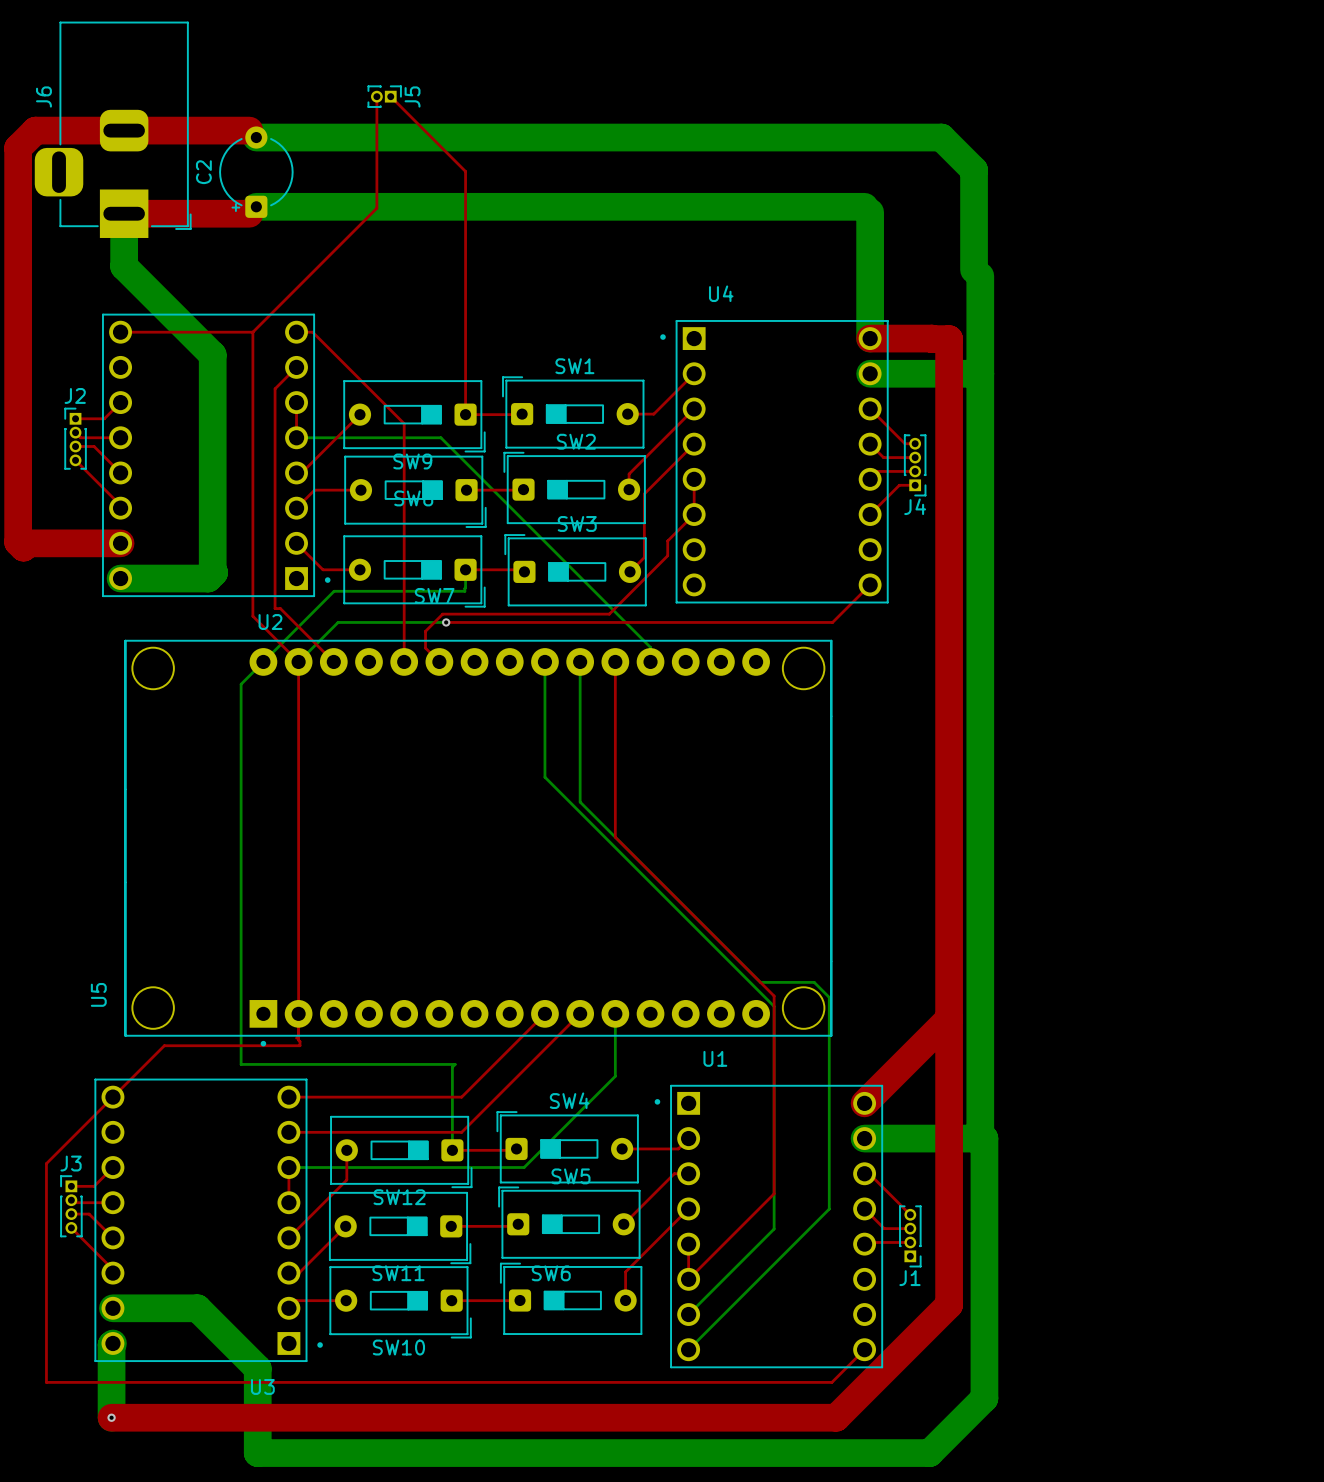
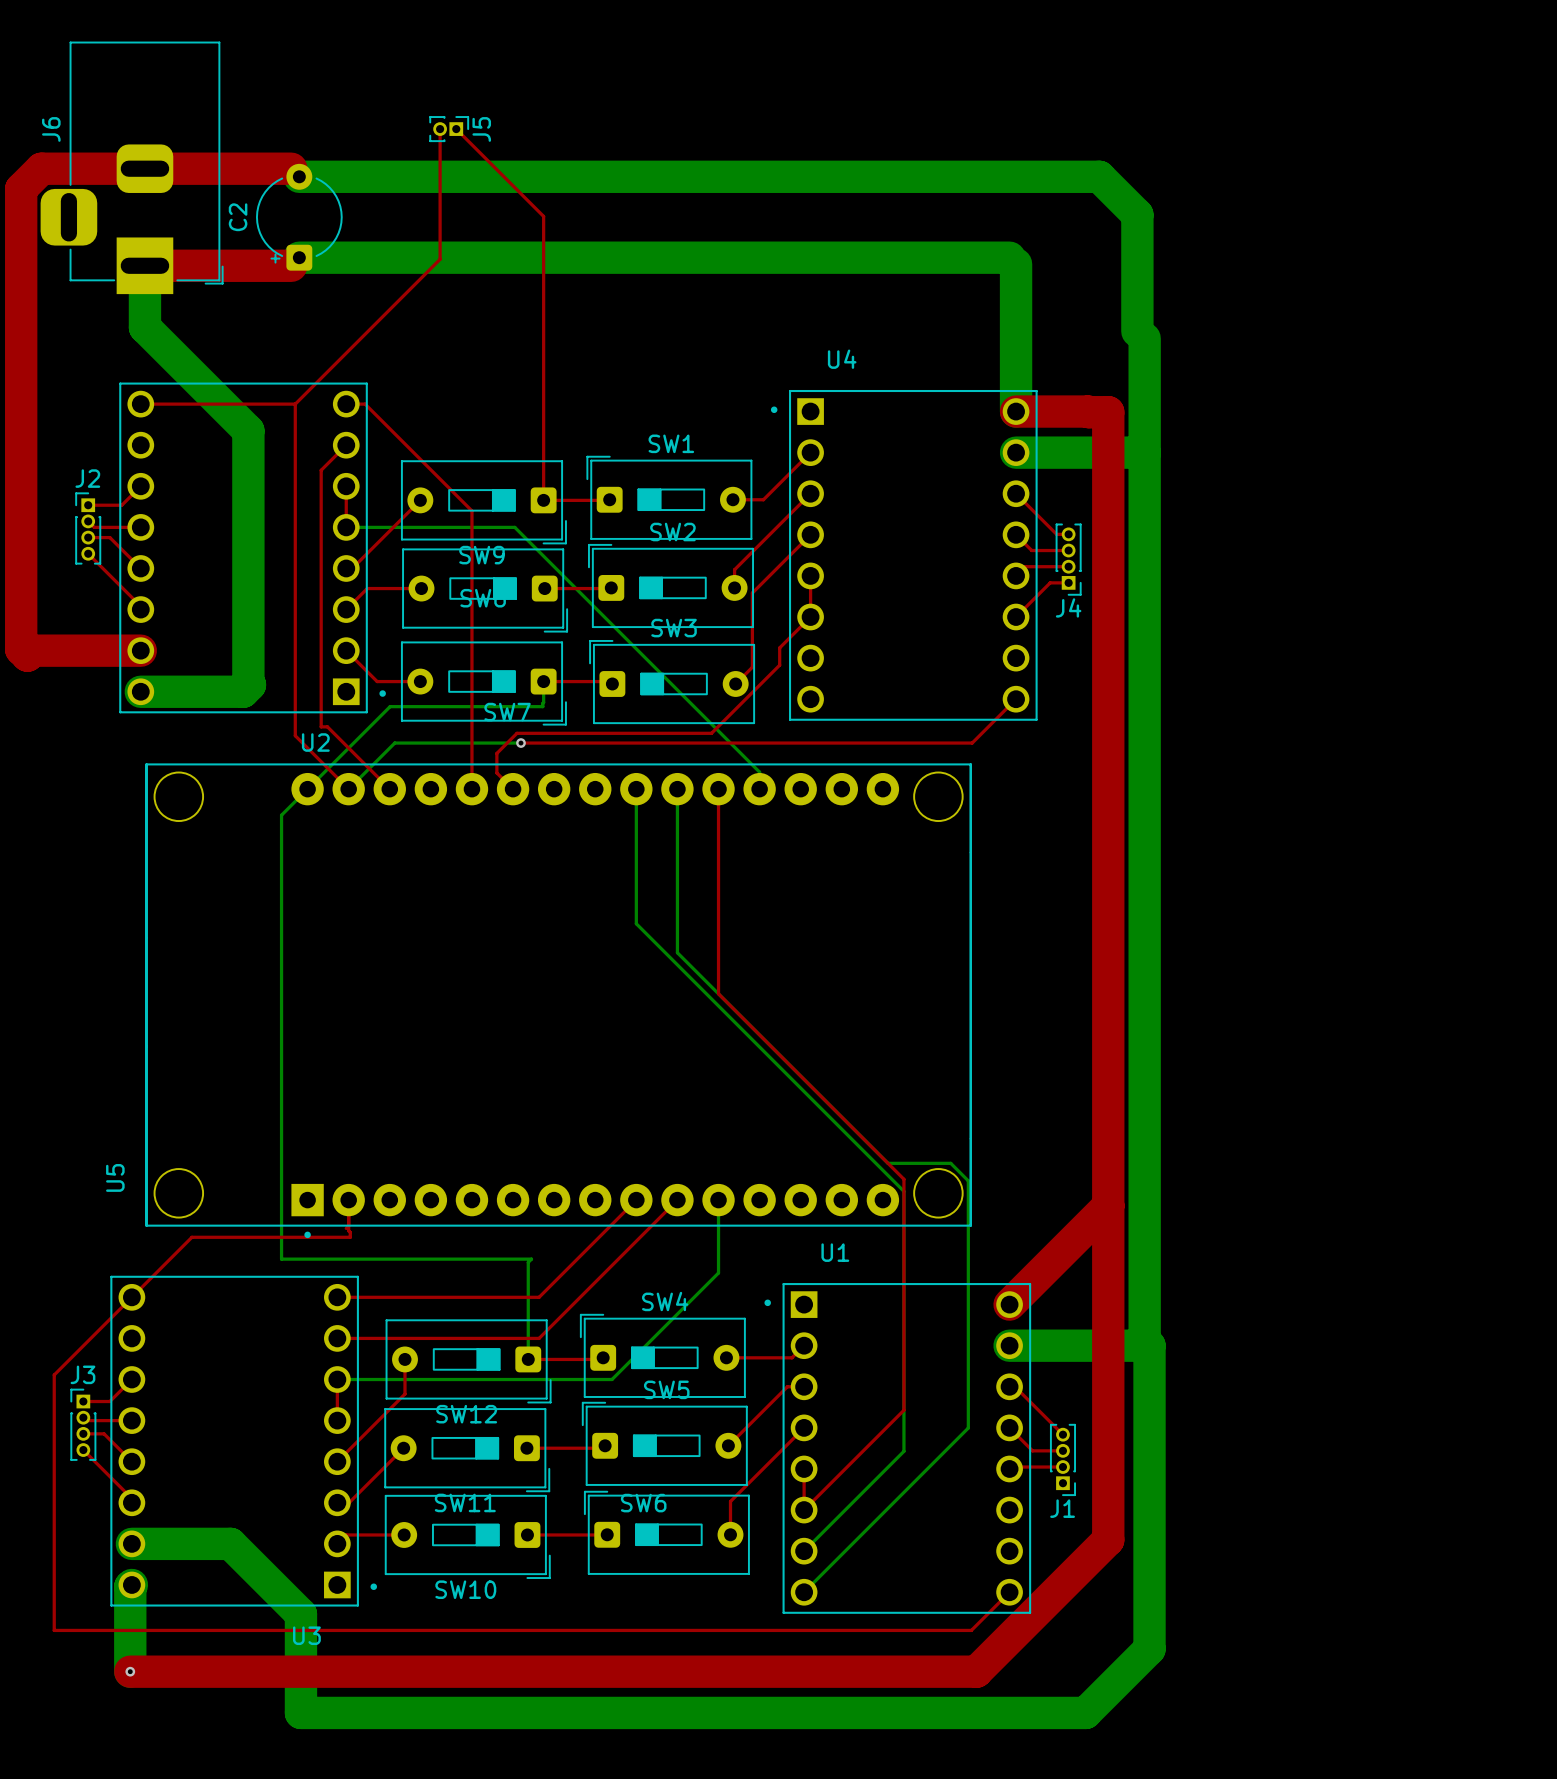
top track: (298, 661) (298, 1013) -> none

